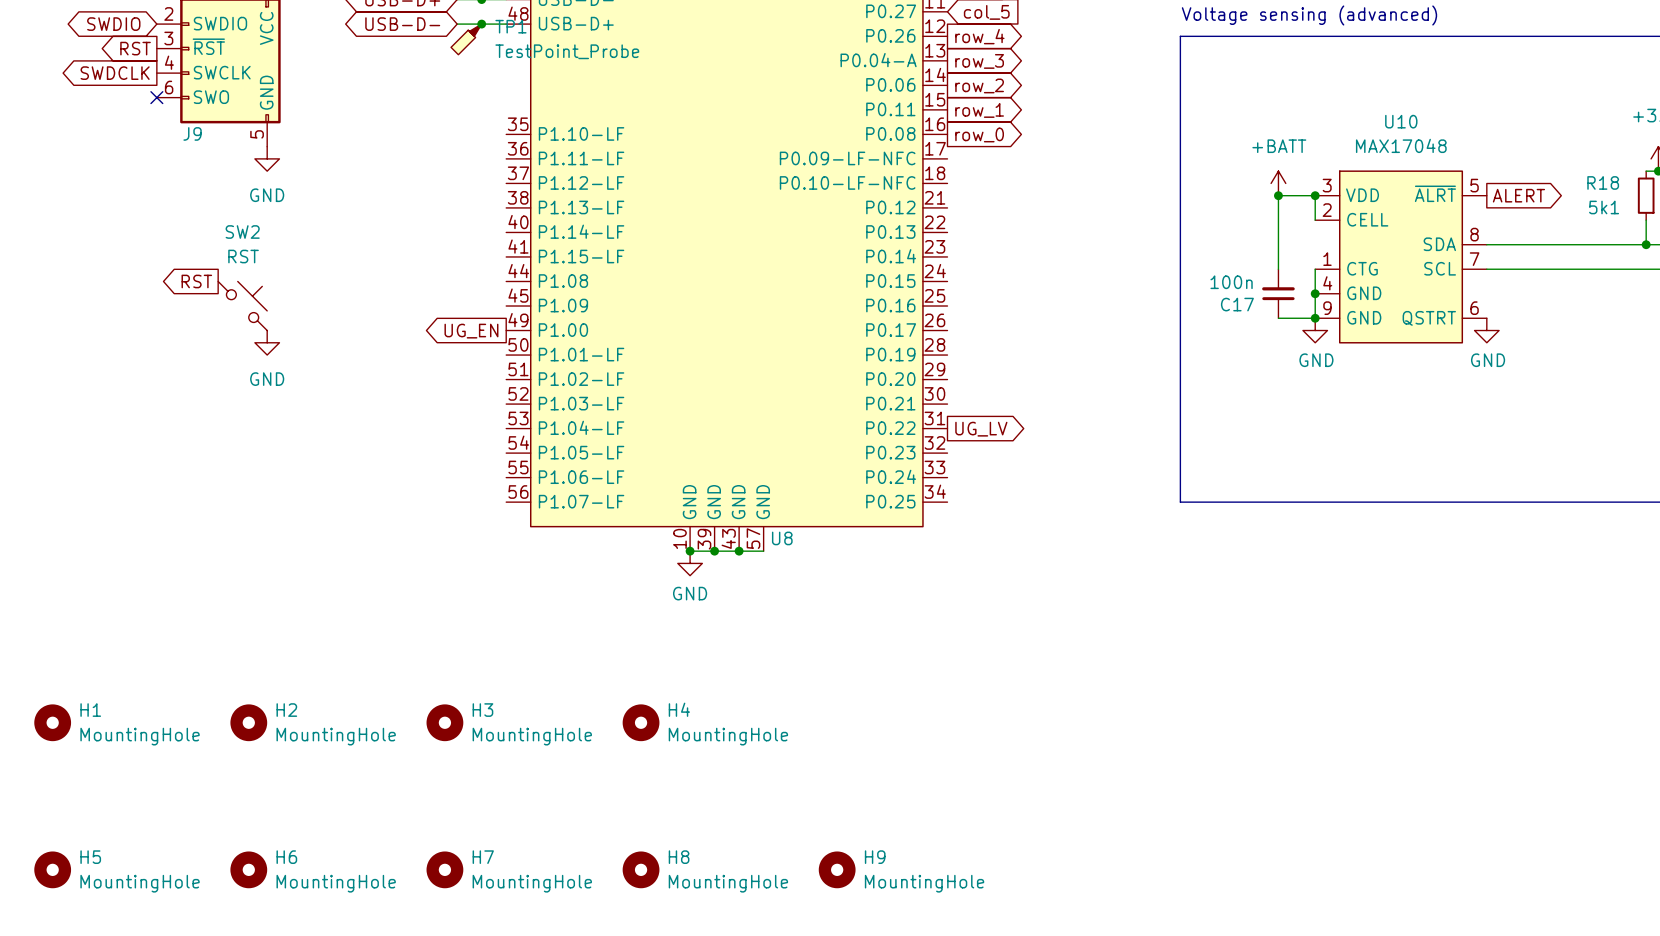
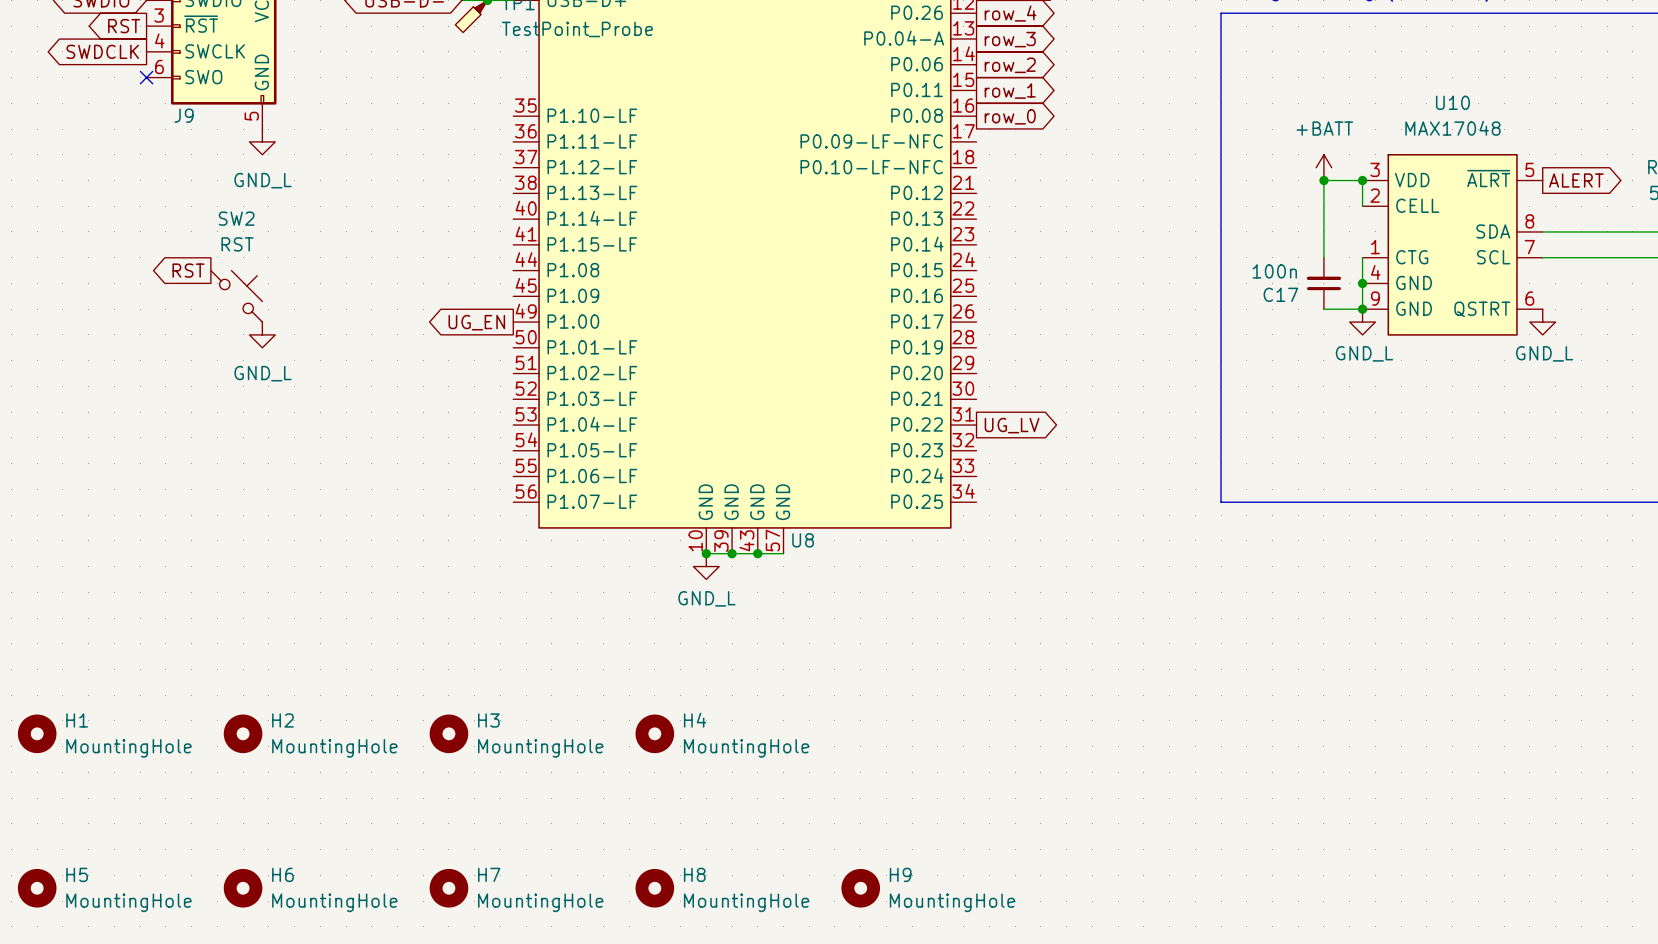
power symbol: GND (267, 158) -> GND_L (262, 141)
power symbol: GND (1315, 330) -> GND_L (1362, 322)
power symbol: GND (1486, 330) -> GND_L (1542, 322)
power symbol: GND (267, 342) -> GND_L (262, 334)
power symbol: GND (690, 563) -> GND_L (706, 566)

